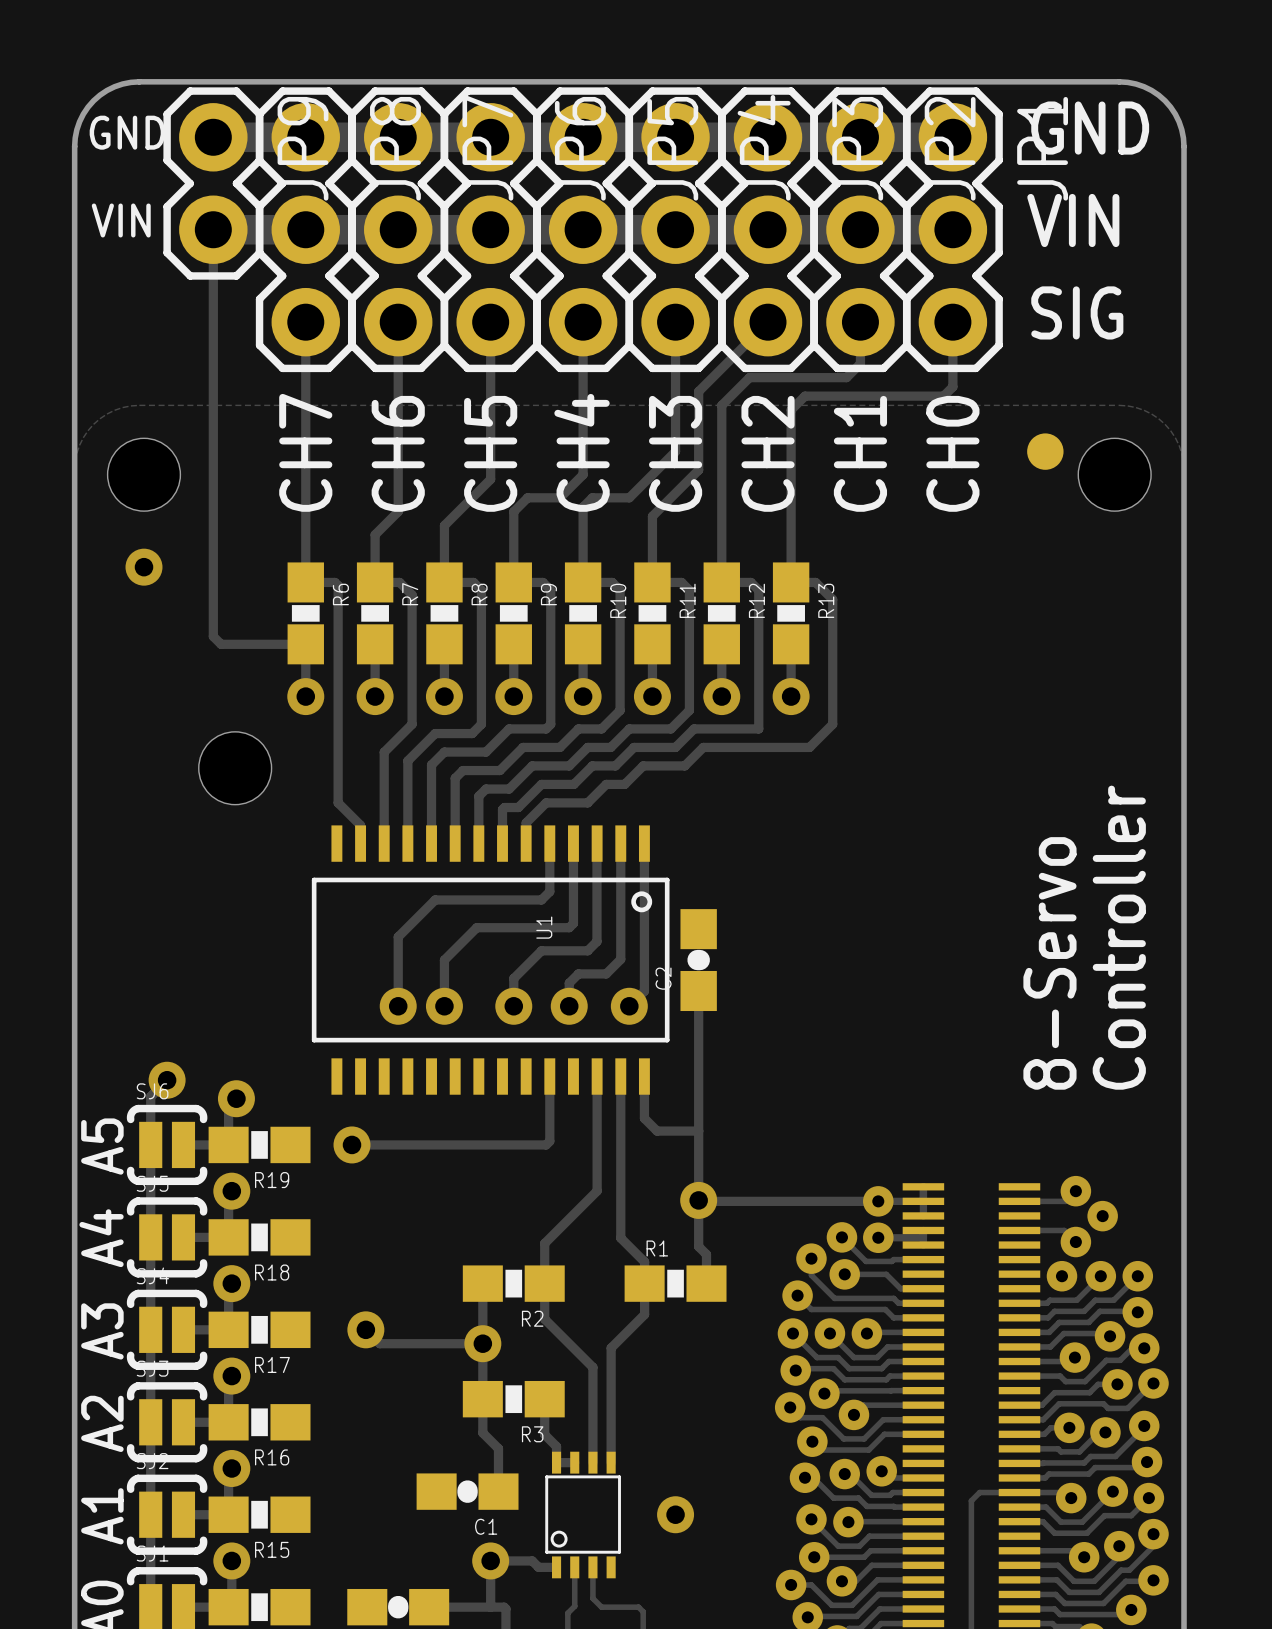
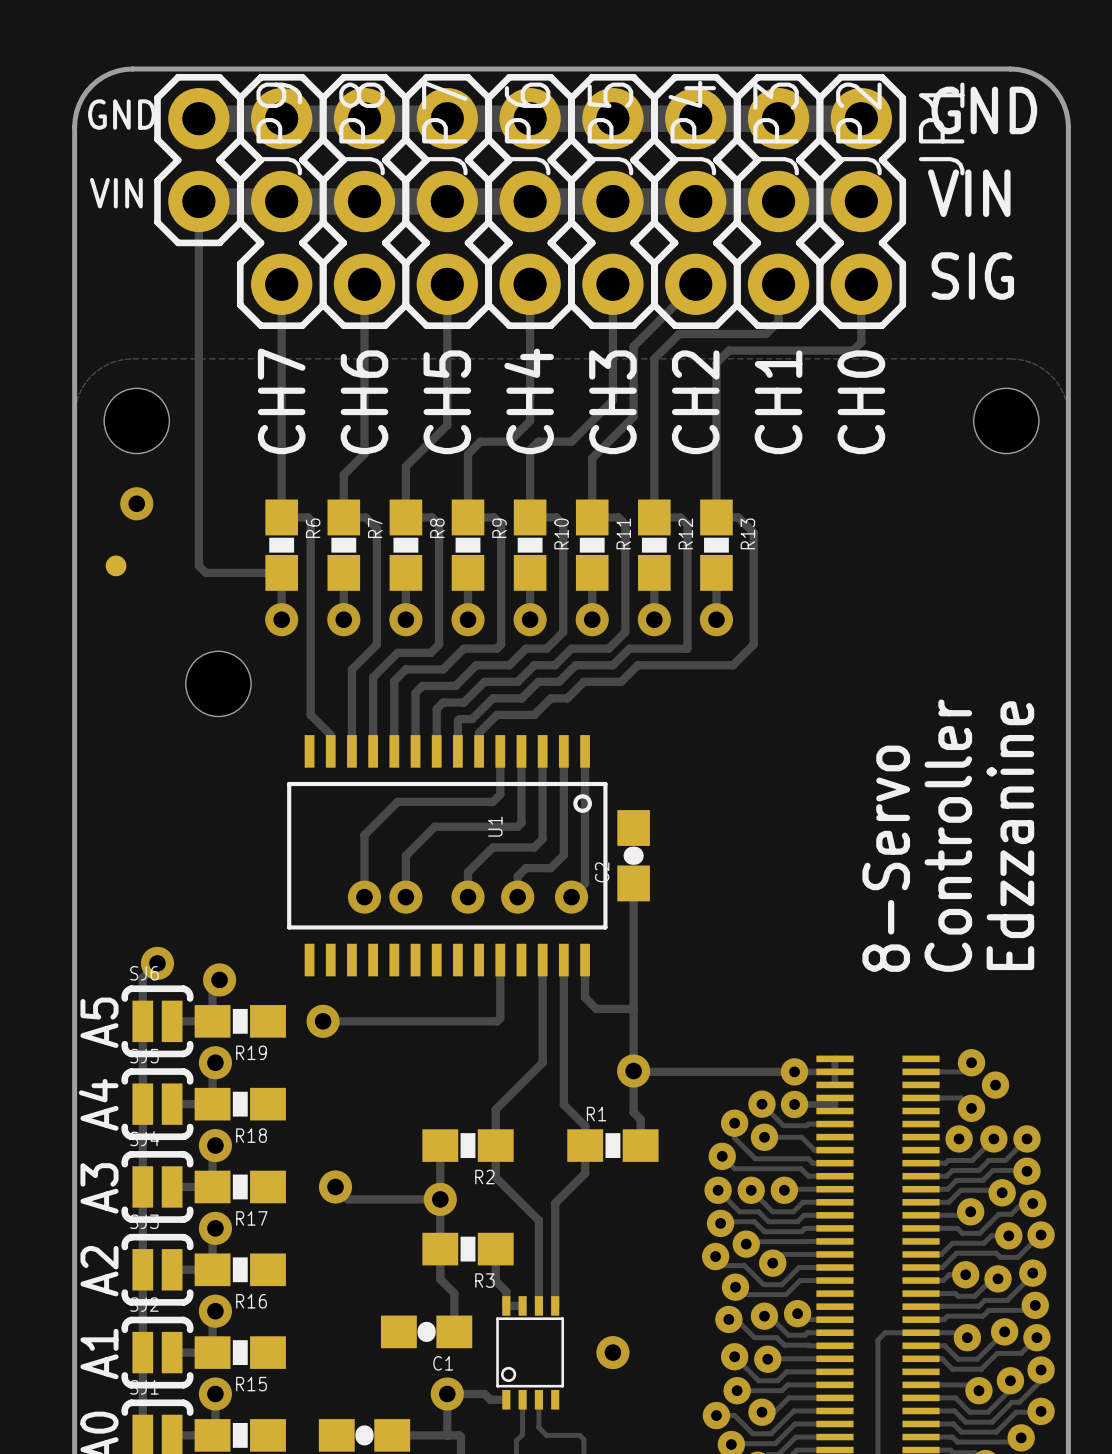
part: (1045, 451) -> none
part: none -> (116, 565)
text: Controller (1119, 937) -> Edzzanine (1010, 835)
text: none -> 8-Servo (886, 858)
text: 8-Servo (1049, 963) -> Controller (948, 835)

